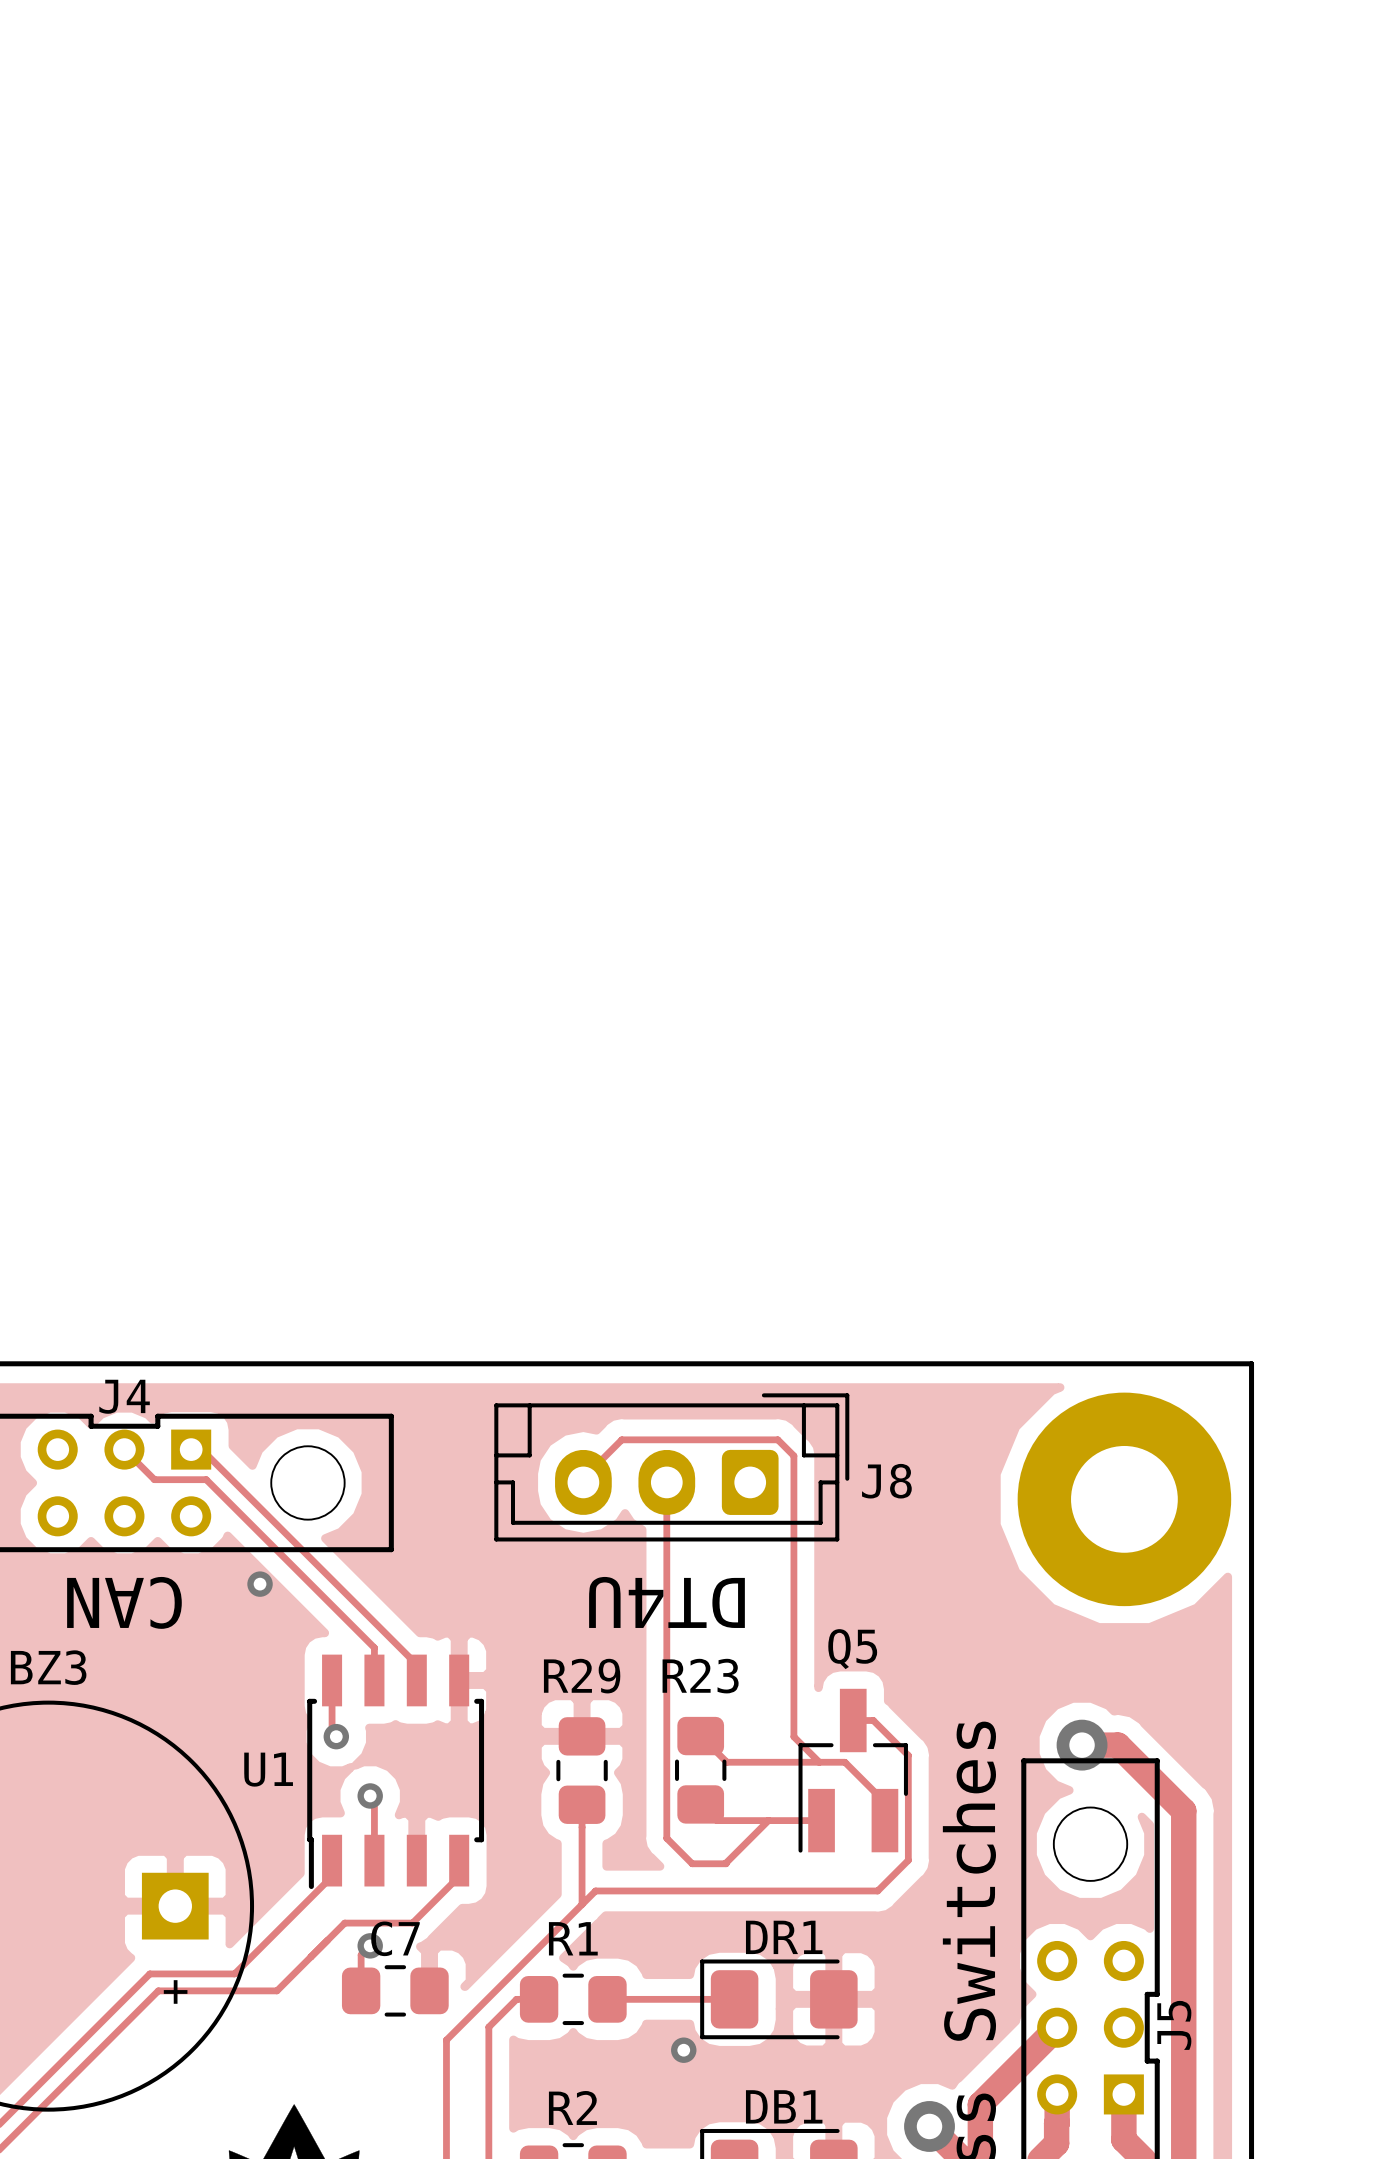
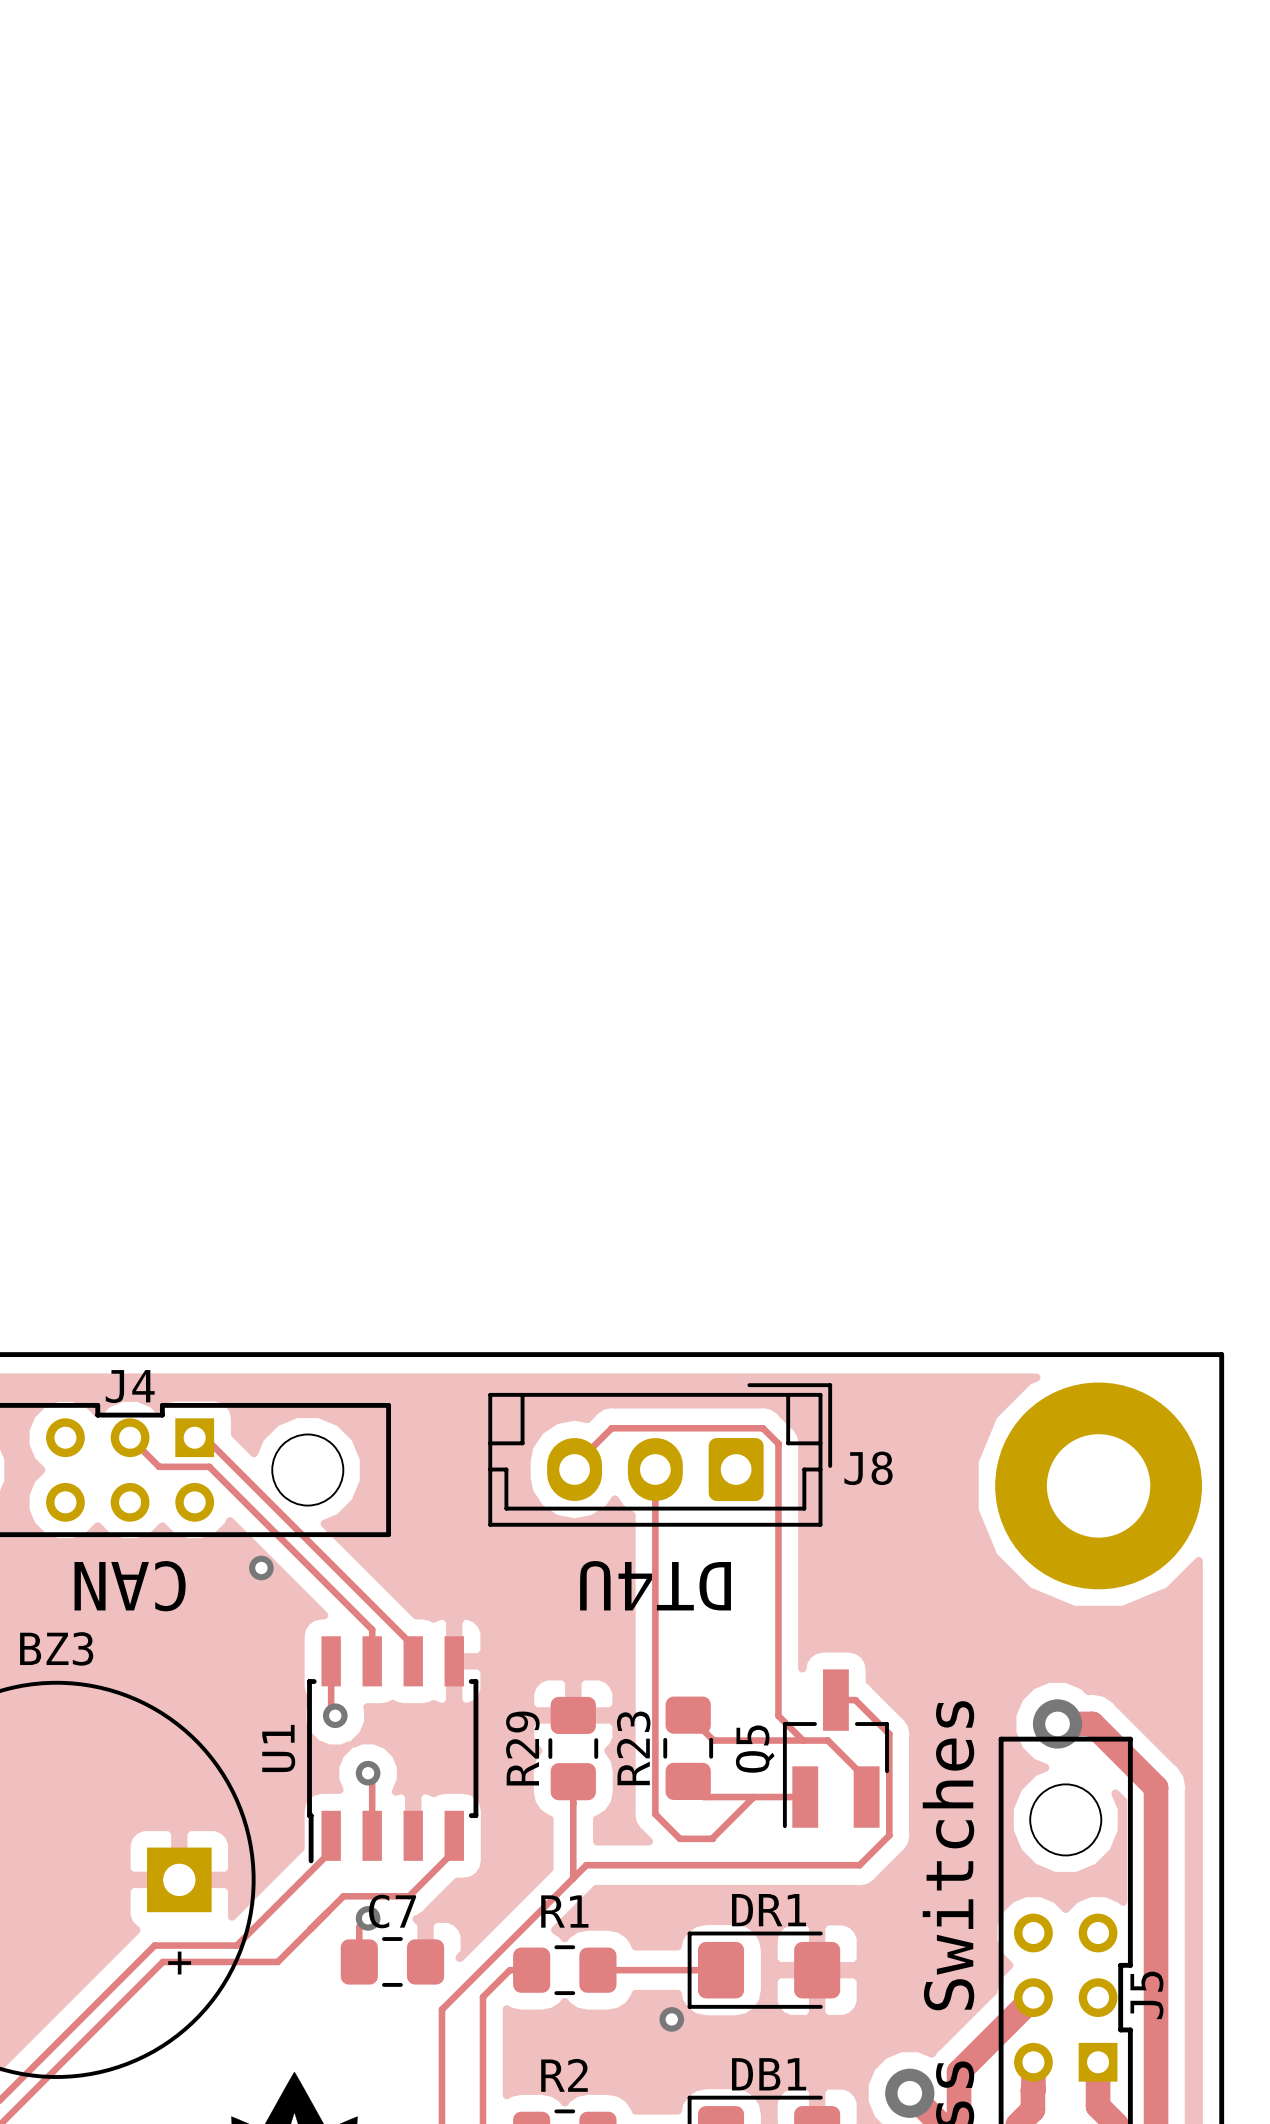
Q5 name rotation: 0° (852, 1649) -> 90° counterclockwise (755, 1749)
Q5 name position: Q5 (852, 1649) -> Q5 (755, 1749)
R29 name rotation: 0° (582, 1676) -> 90° counterclockwise (522, 1748)
R23 name rotation: 0° (700, 1676) -> 90° counterclockwise (633, 1748)
U1 name rotation: 0° (268, 1769) -> 90° counterclockwise (278, 1748)

